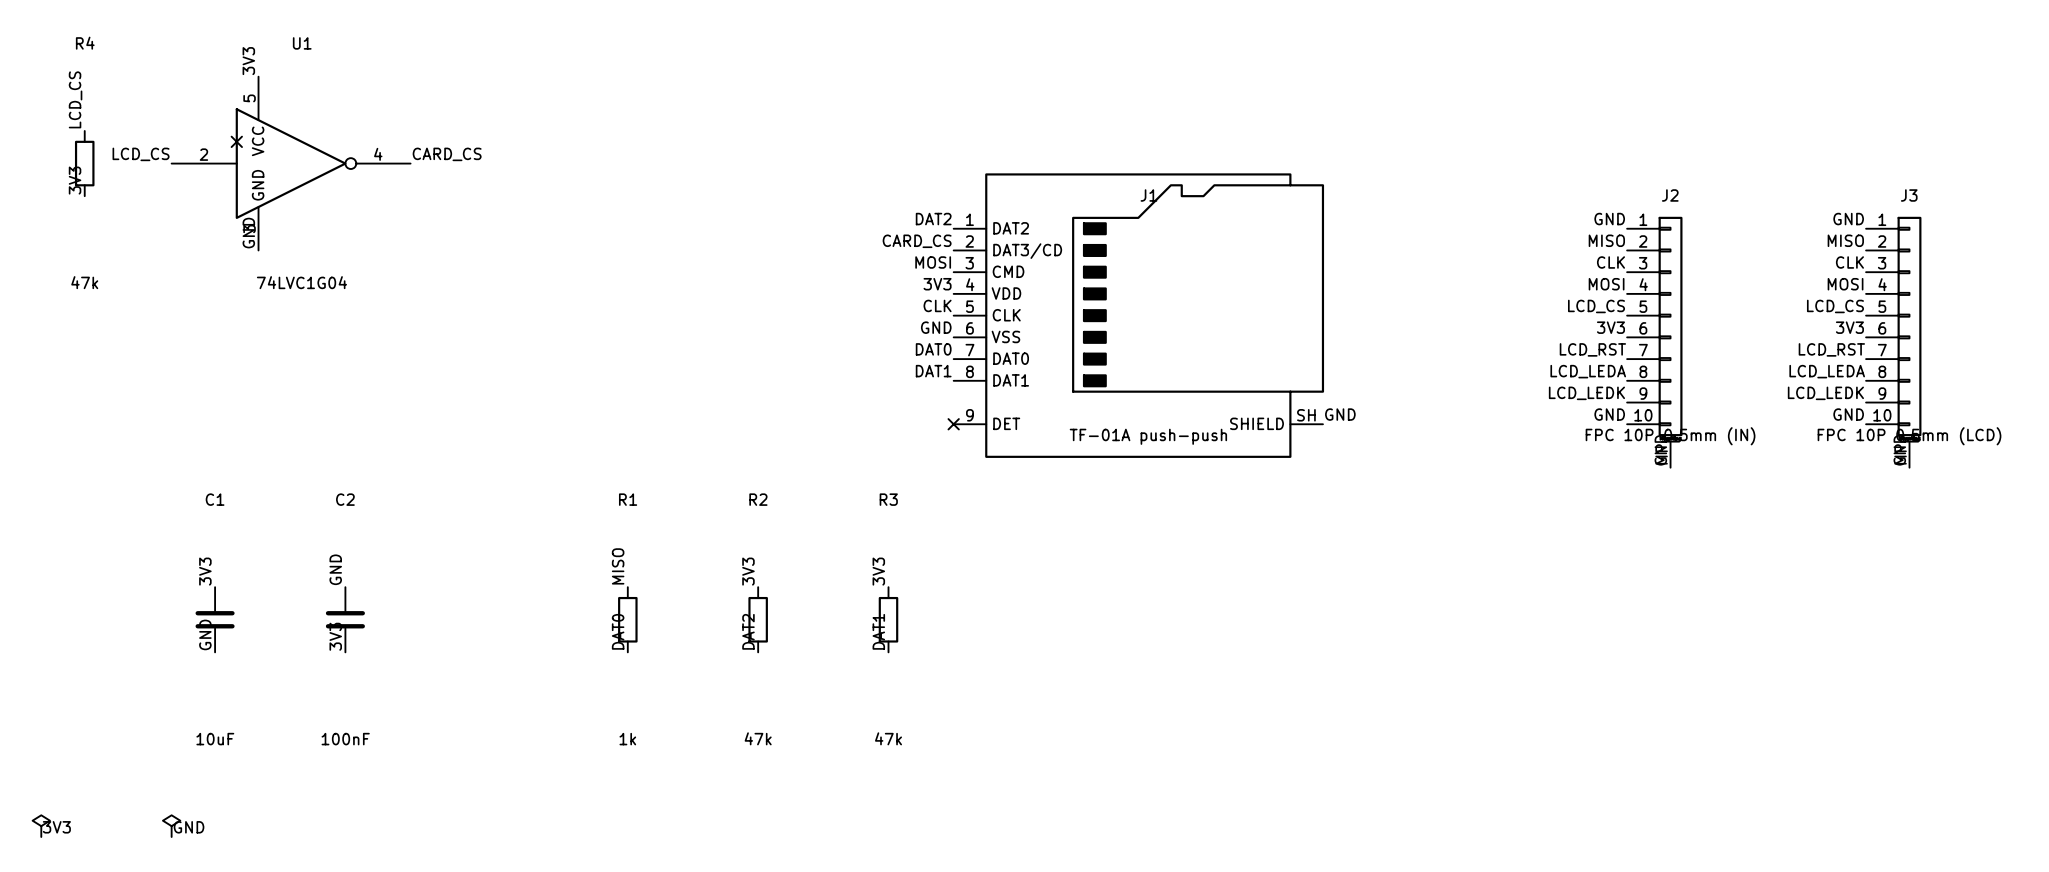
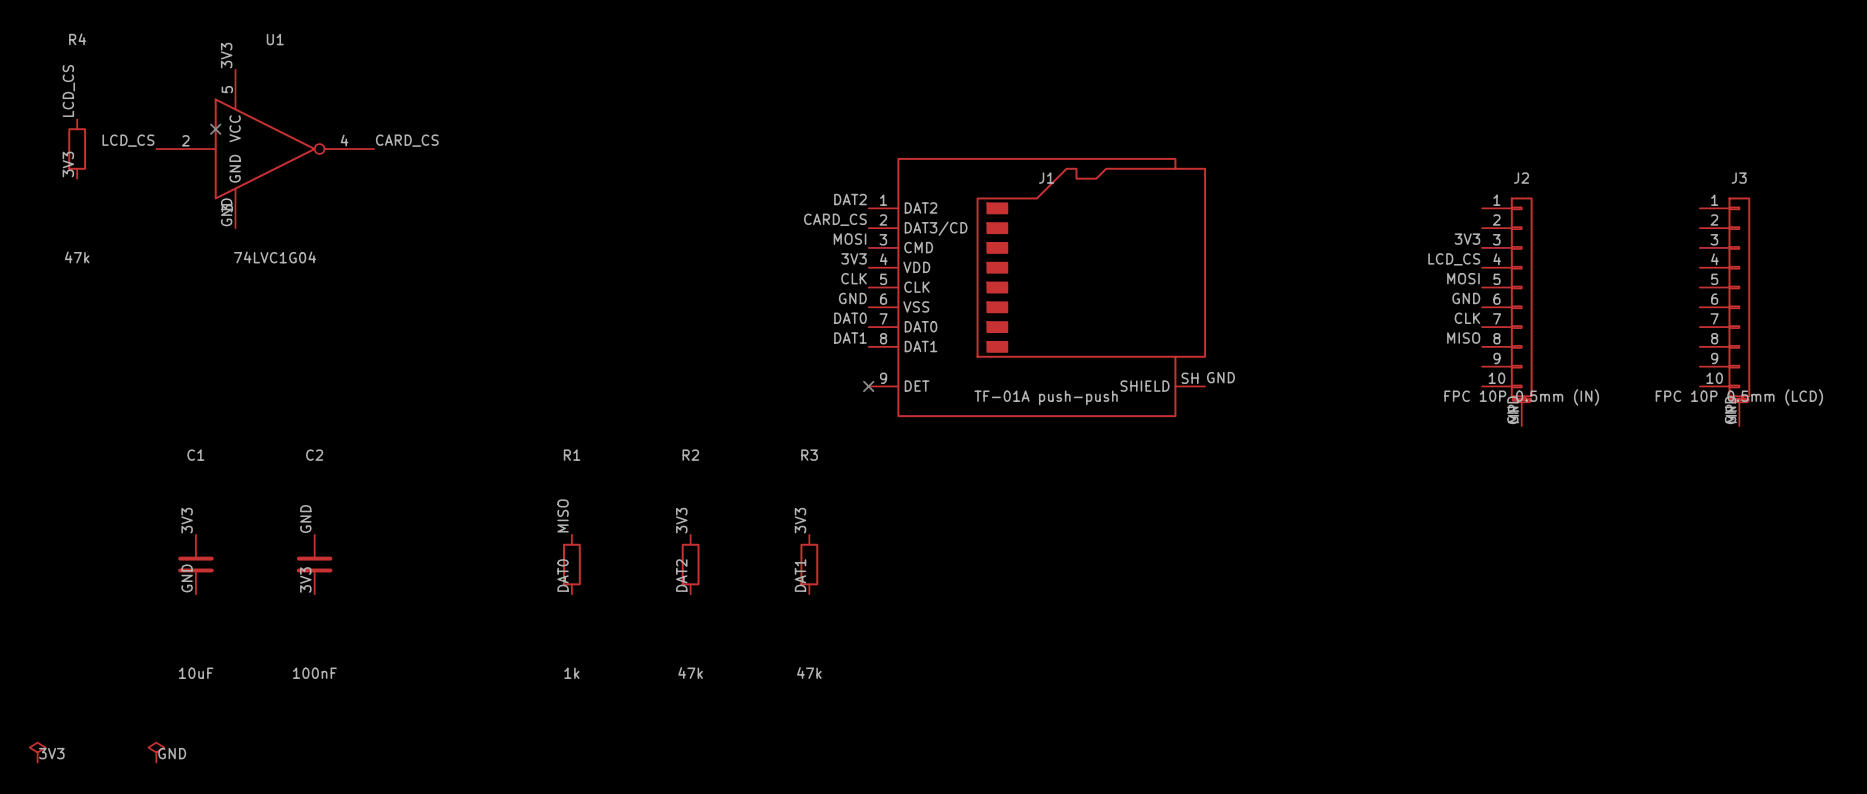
label: GND (1609, 219) -> none
label: GND (1848, 219) -> none
label: MISO (1606, 240) -> none
label: MISO (1845, 240) -> none
label: CLK (1610, 262) -> 3V3 (1467, 239)
label: CLK (1849, 262) -> none
label: MOSI (1606, 284) -> LCD_CS (1454, 259)
label: MOSI (1845, 284) -> none
label: LCD_CS (1596, 306) -> MOSI (1463, 278)
label: LCD_CS (1835, 306) -> none
label: 3V3 (1610, 327) -> GND (1466, 298)
label: 3V3 (1849, 327) -> none
label: LCD_RST (1592, 349) -> CLK (1467, 318)
label: LCD_RST (1831, 349) -> none
label: LCD_LEDA (1588, 371) -> MISO (1463, 338)
label: LCD_LEDA (1827, 371) -> none
label: LCD_LEDK (1586, 393) -> none
label: LCD_LEDK (1825, 393) -> none
label: GND (1609, 414) -> none
label: GND (1848, 414) -> none

